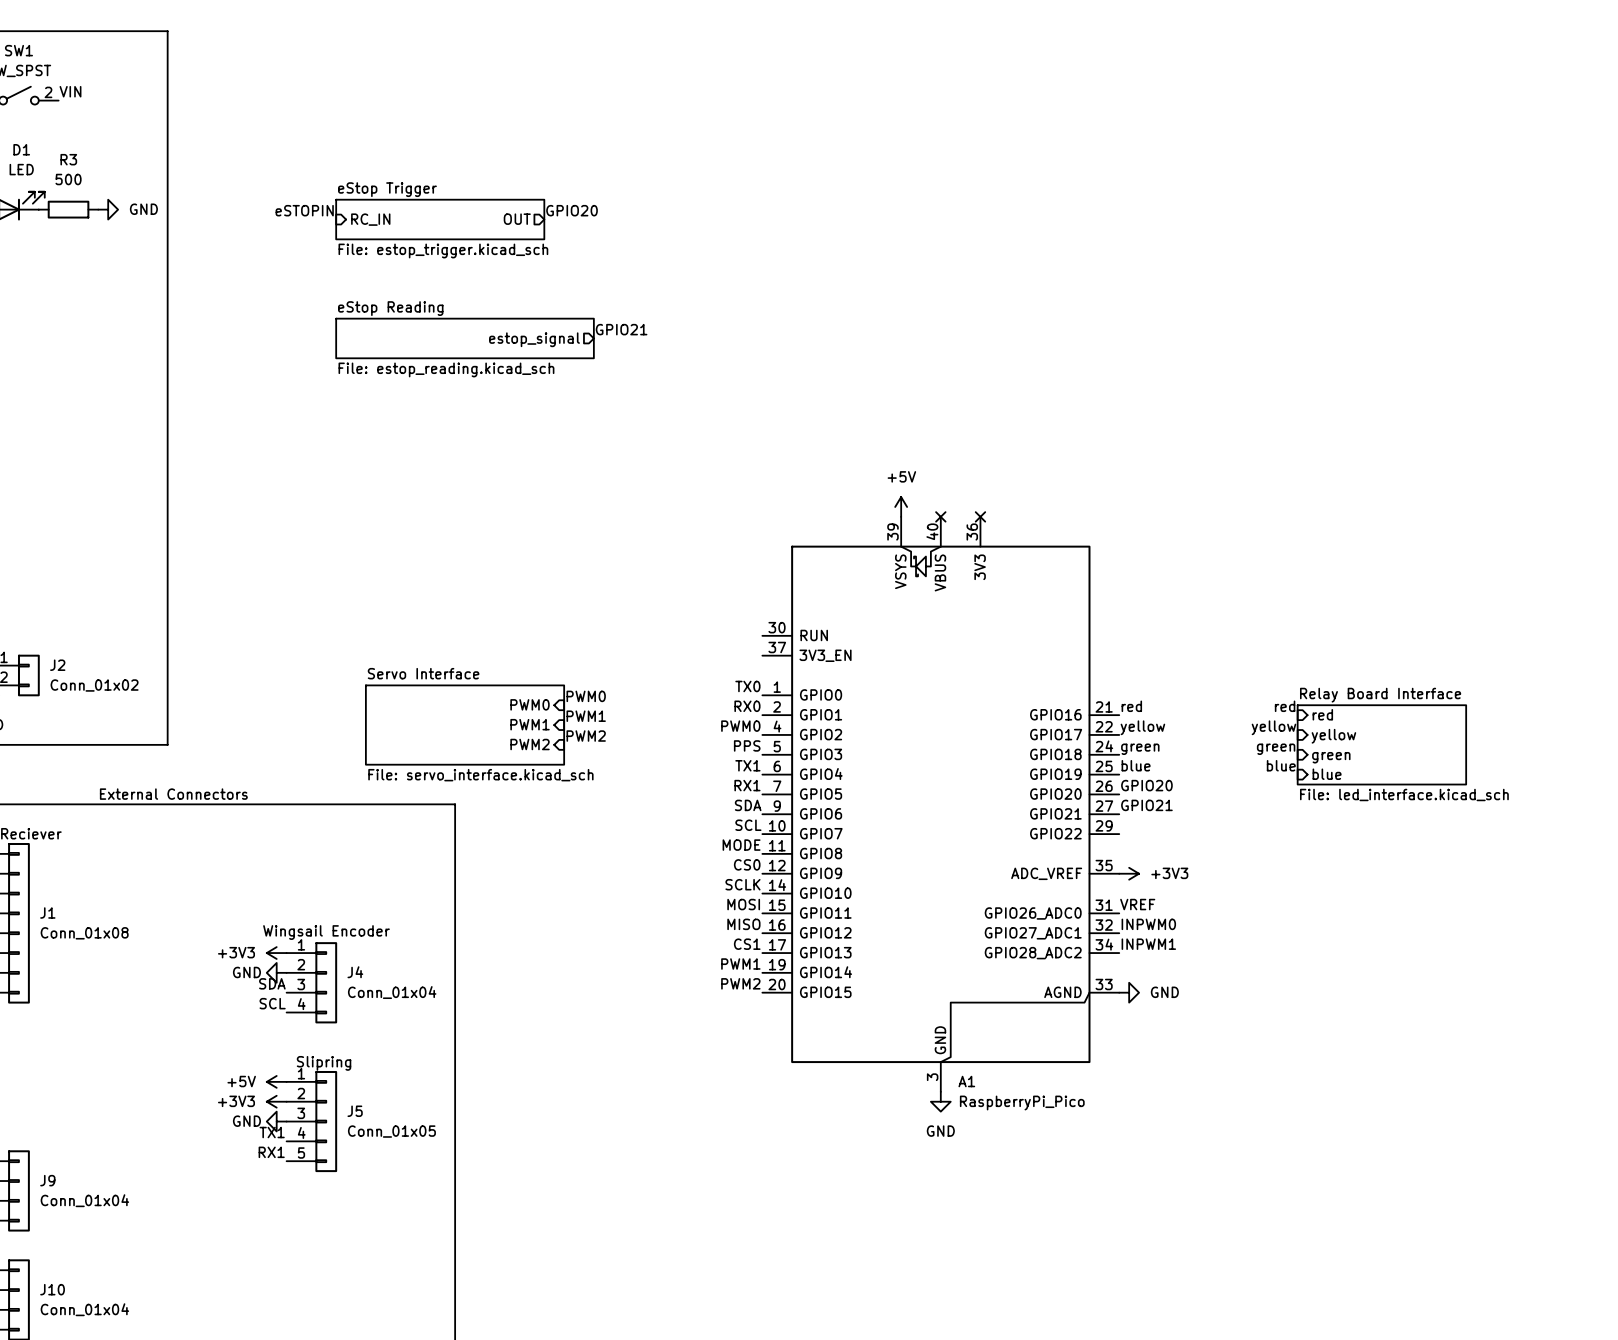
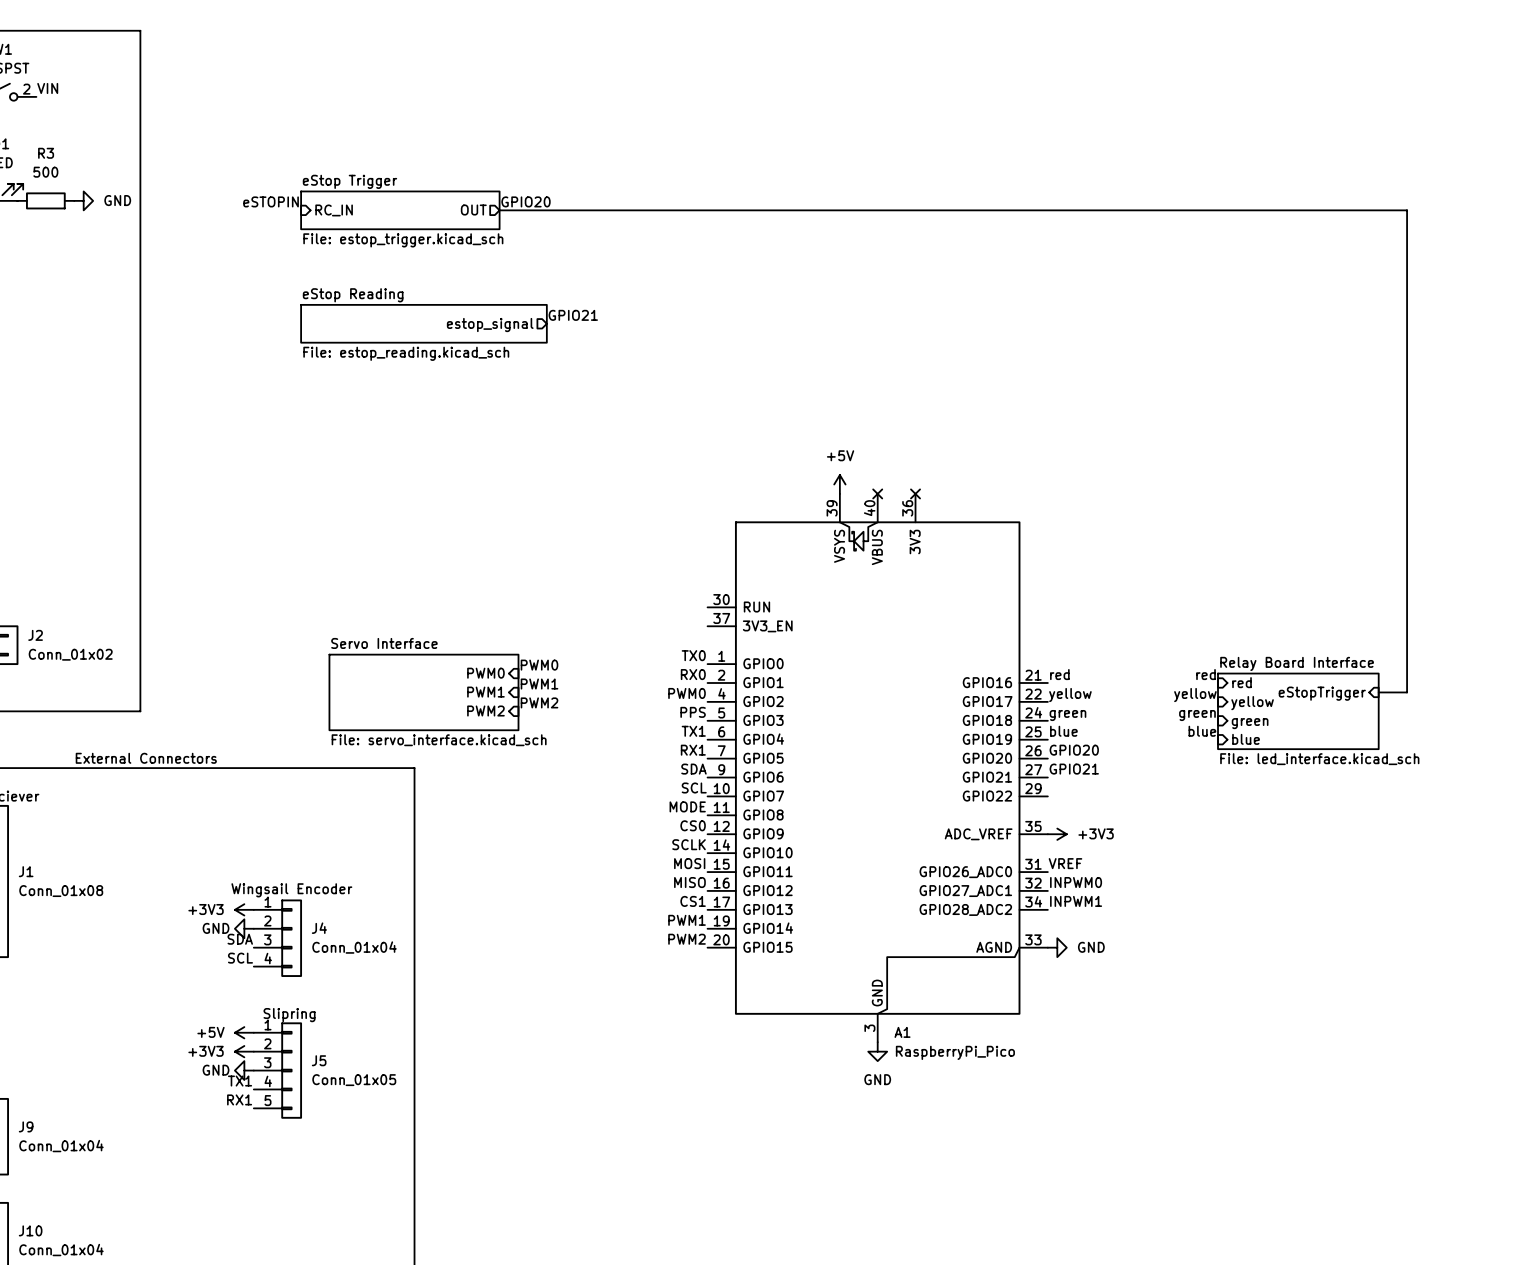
wire: none -> (499, 210) (1407, 210) (1407, 692) (1378, 692)
sheet pin: none -> eStopTrigger (1322, 693)

